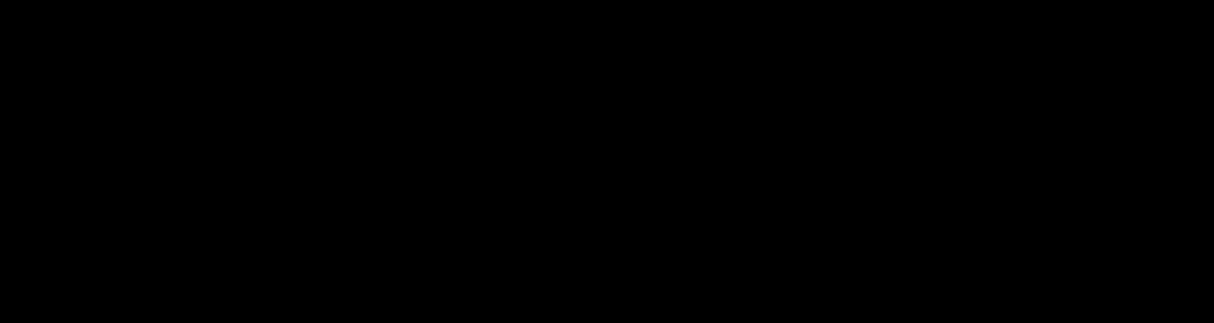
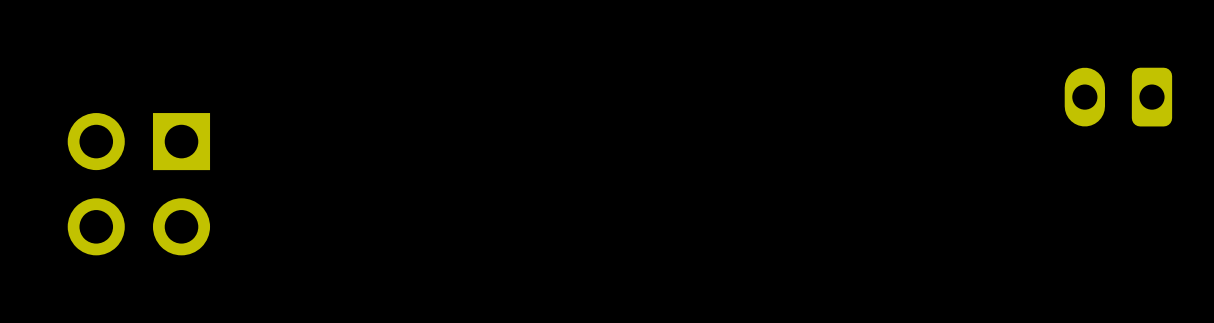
part: none -> (1118, 97)
part: none -> (138, 184)

